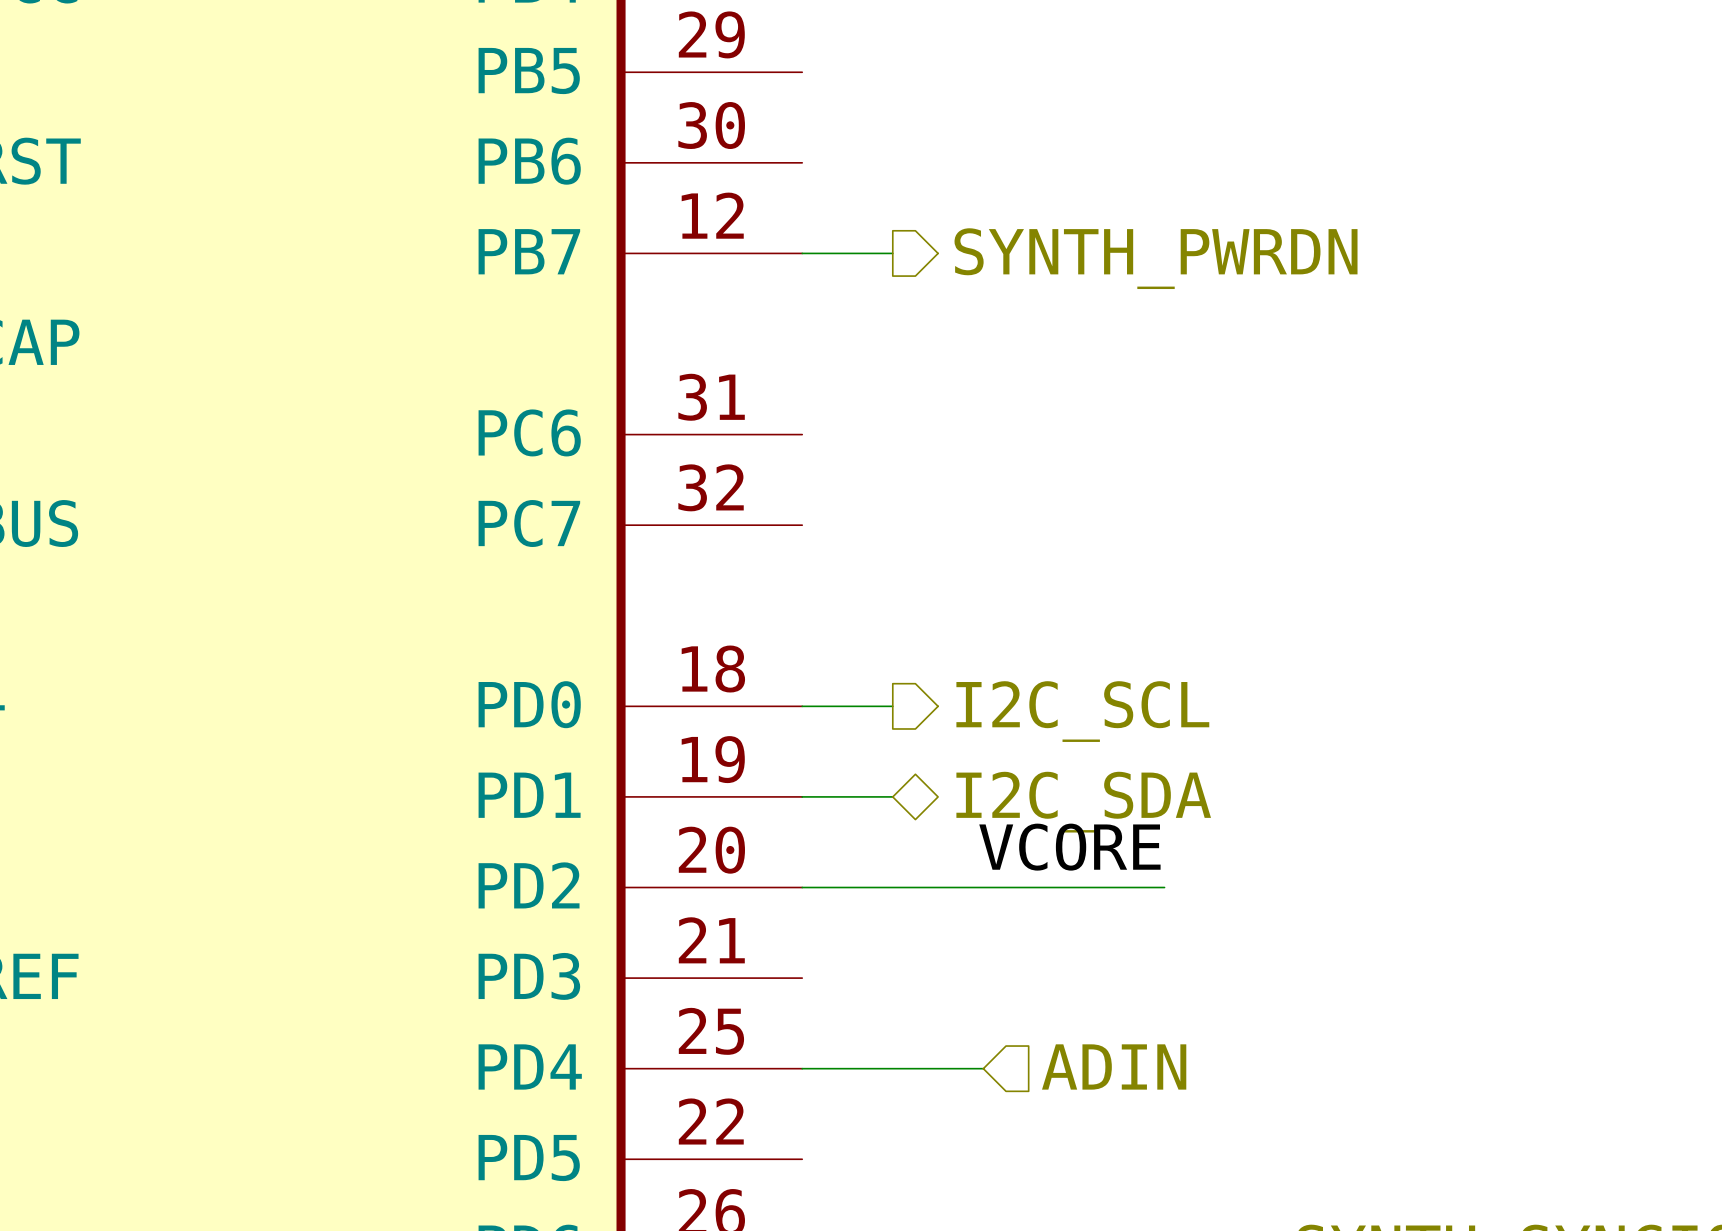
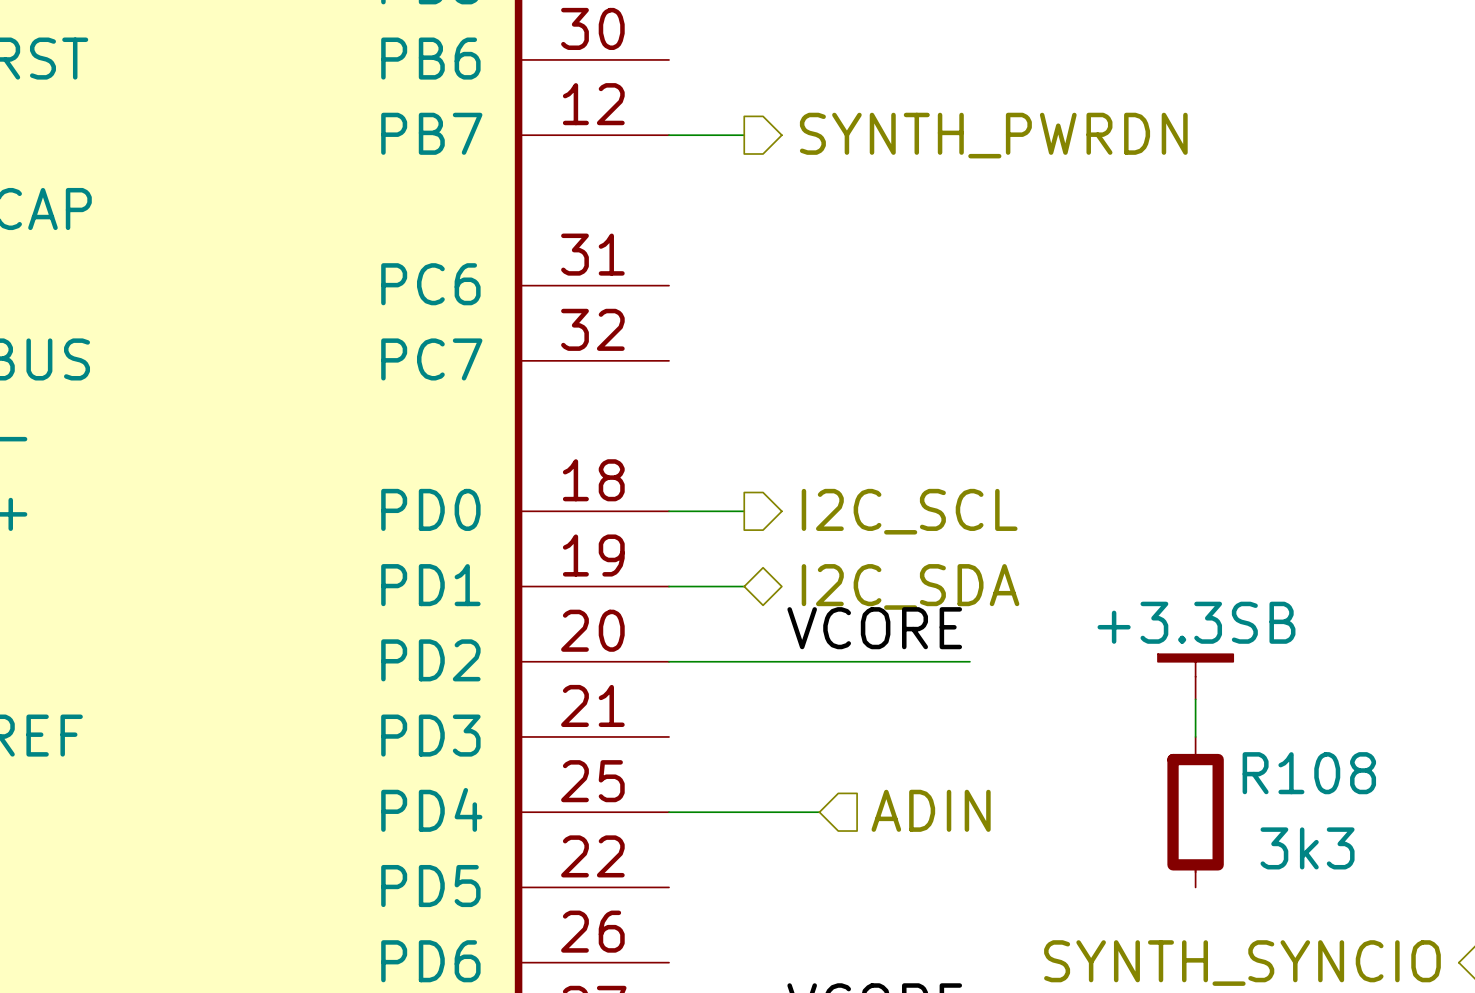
power symbol: none -> +3.3SB (1195, 676)
wire: none -> (1195, 699) (1195, 736)
R108: none -> 3k3 (1195, 812)

